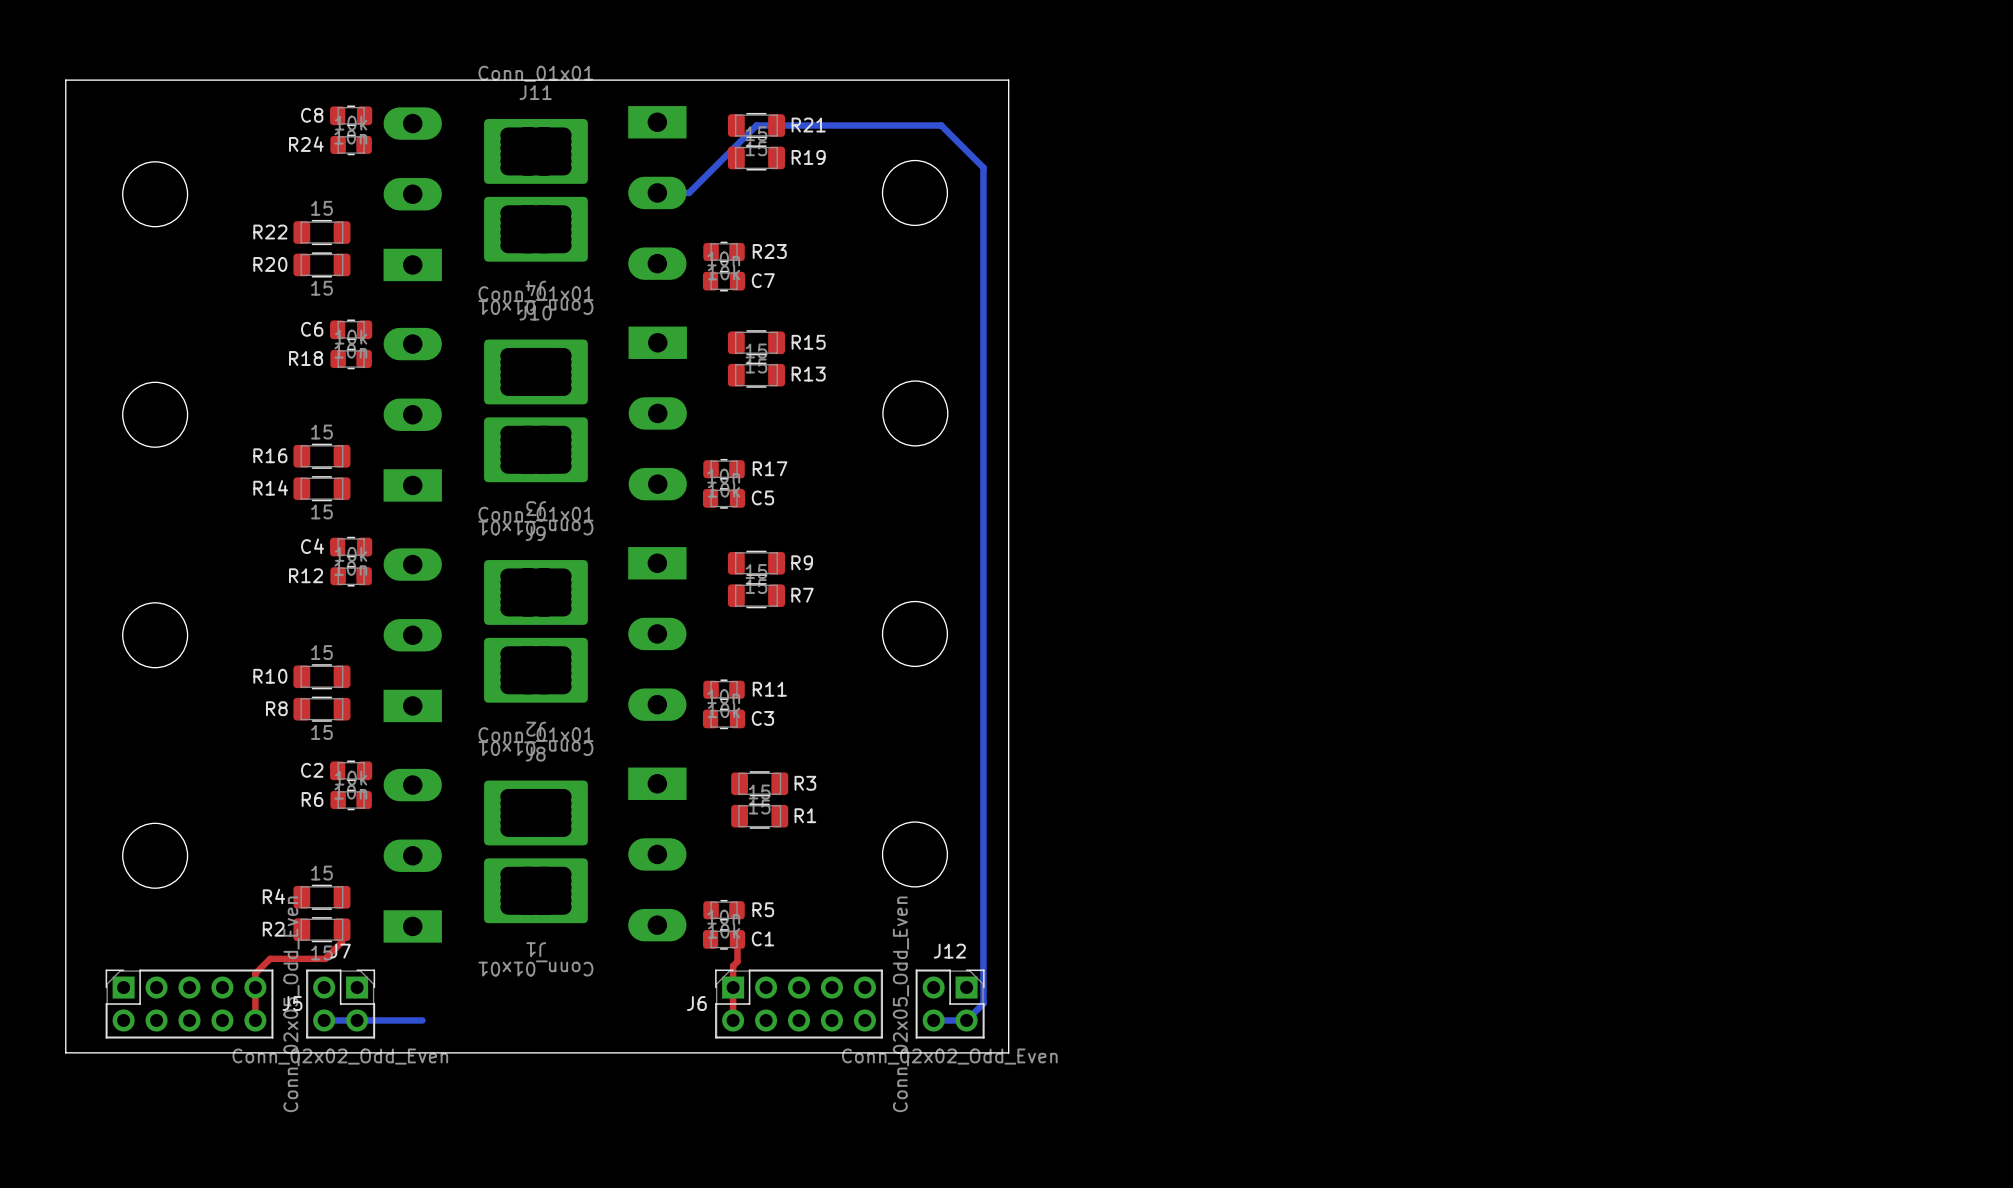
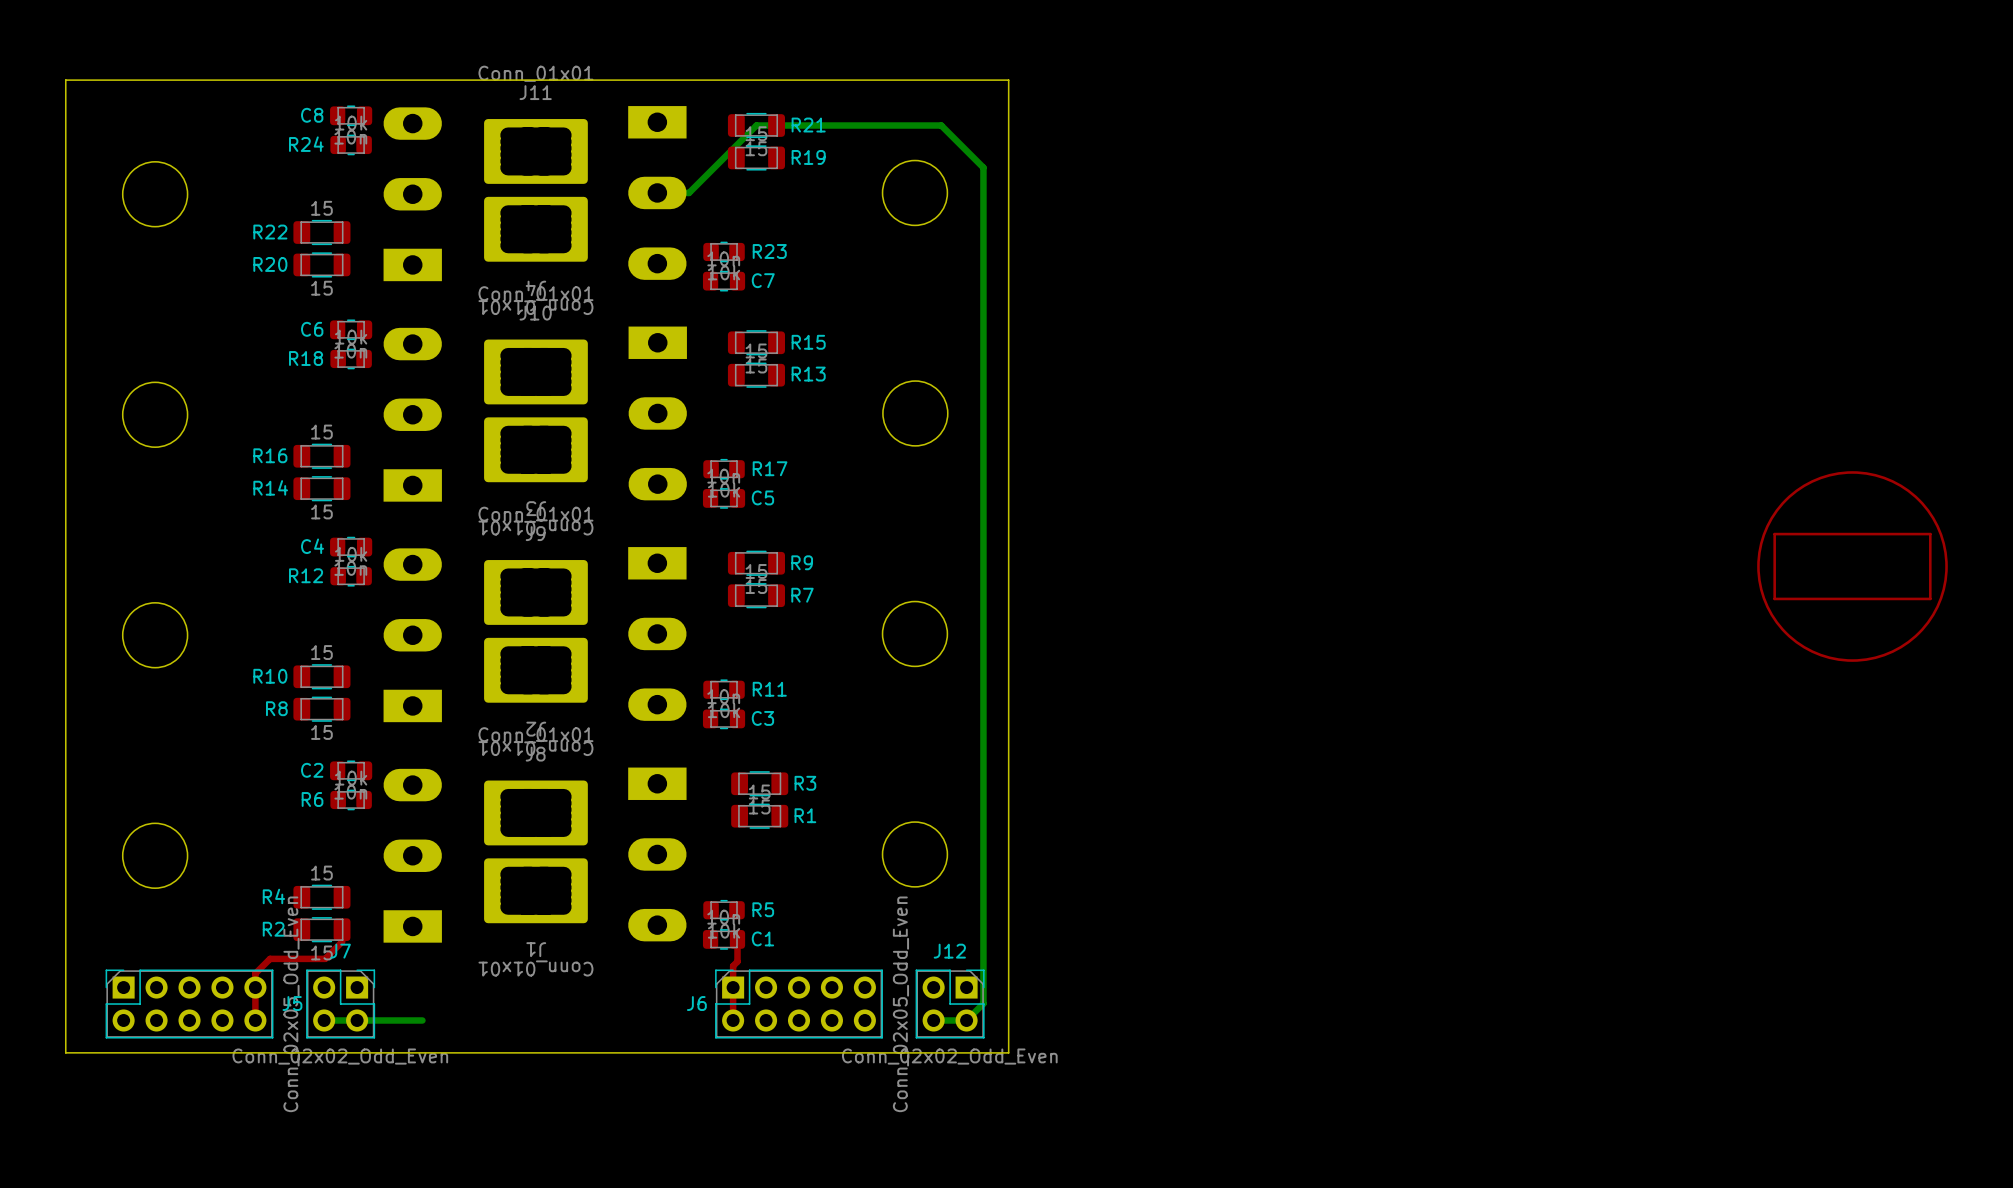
drawing: none -> [1757, 471, 1948, 662]
top track: none -> (1774, 534) (1930, 534) (1930, 598) (1774, 598) (1774, 534)

